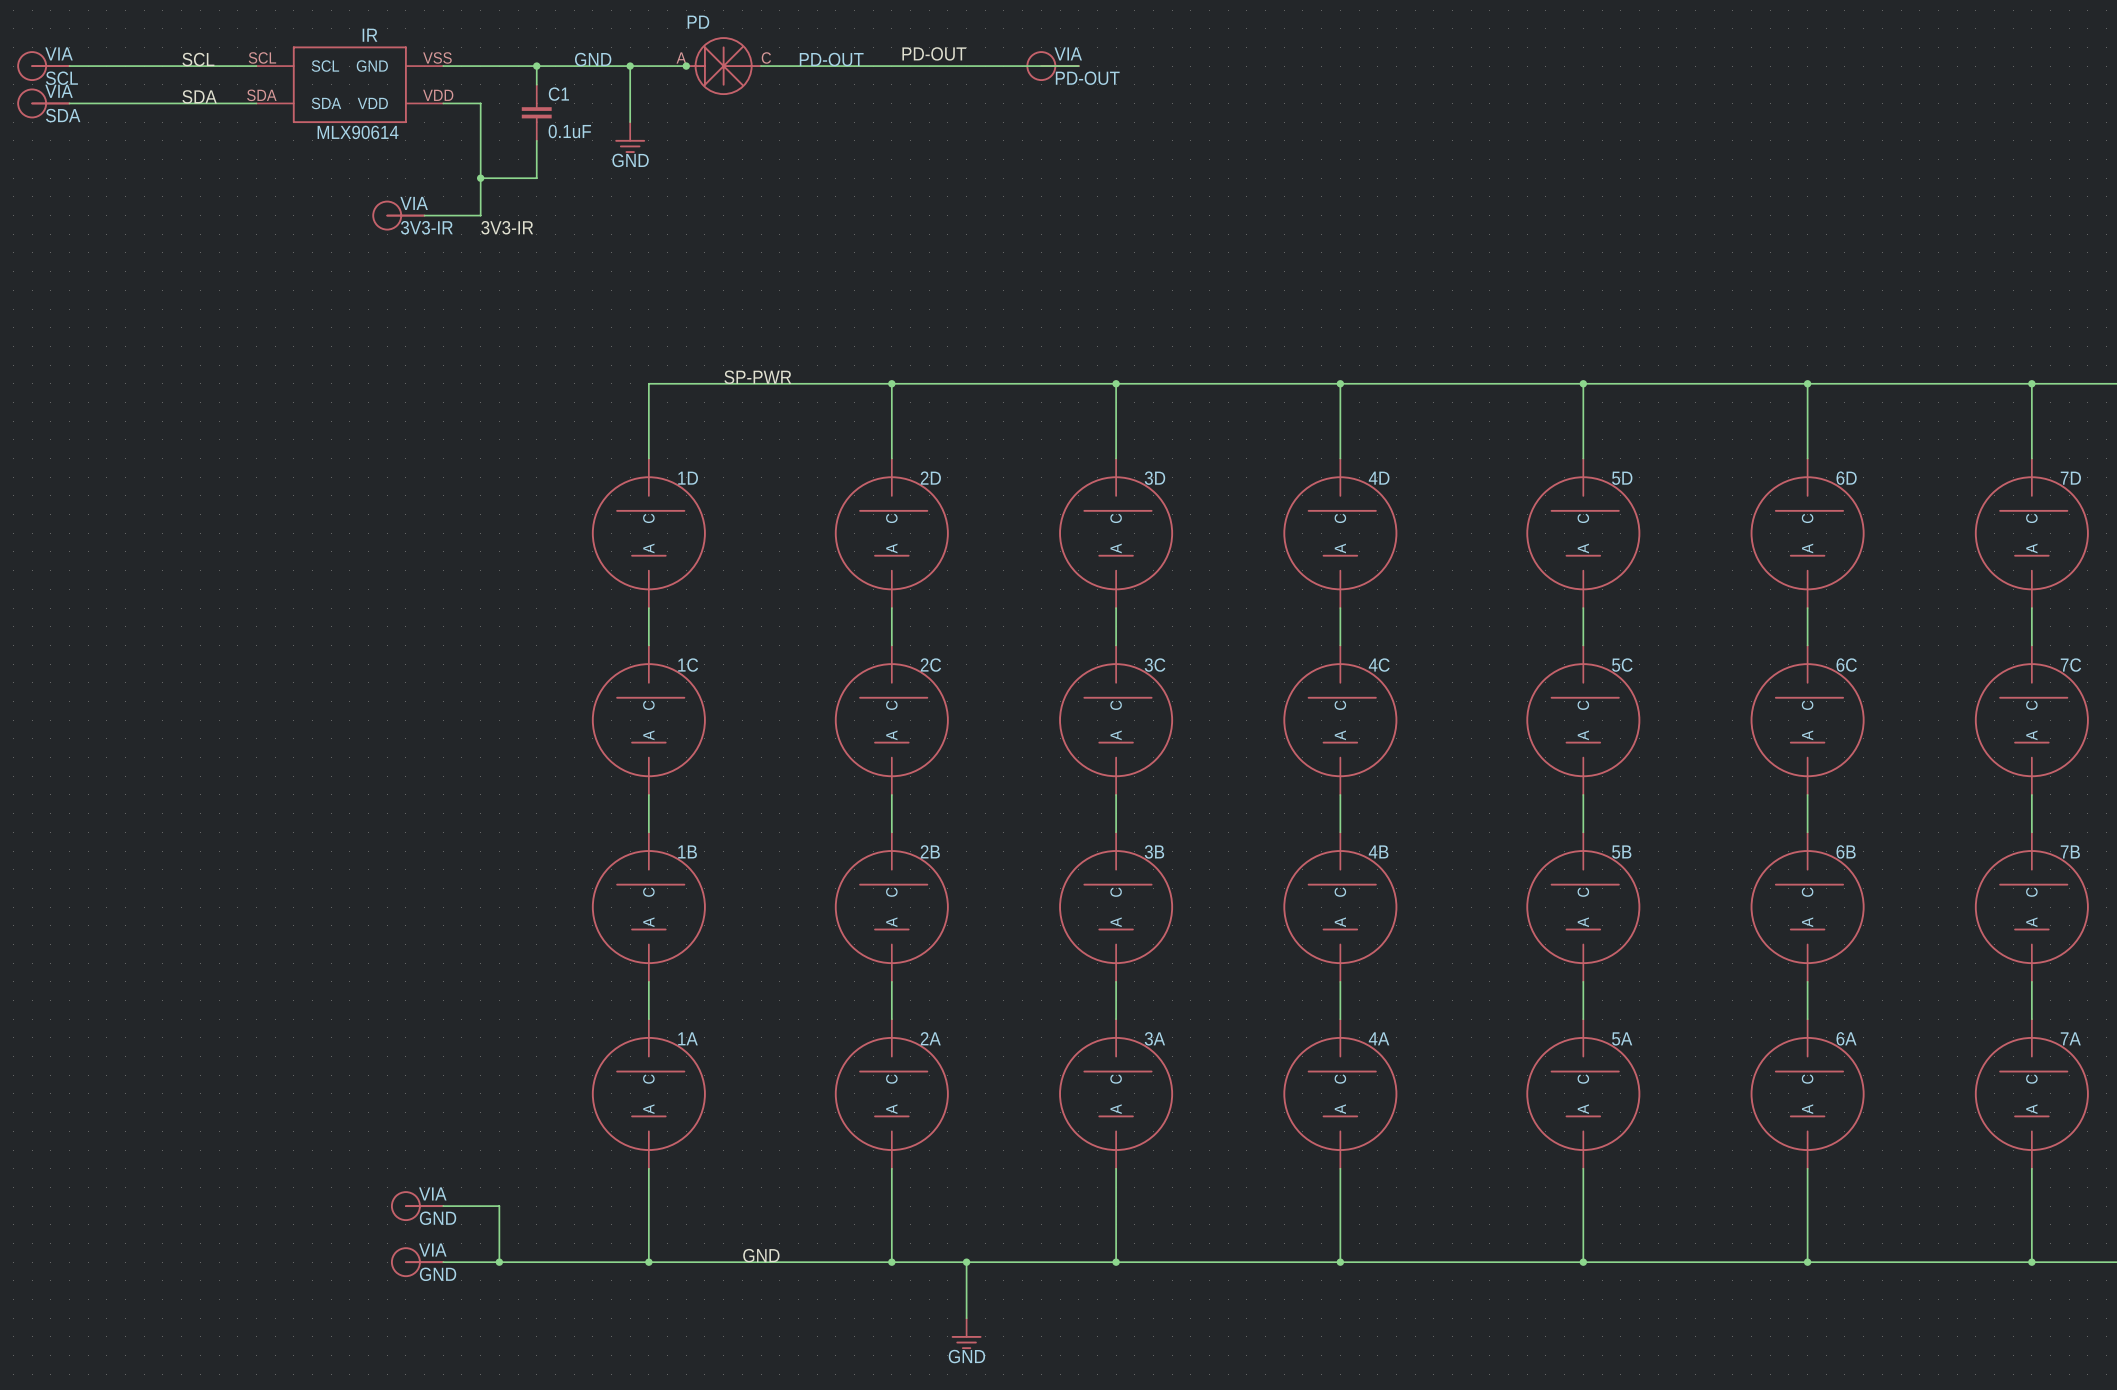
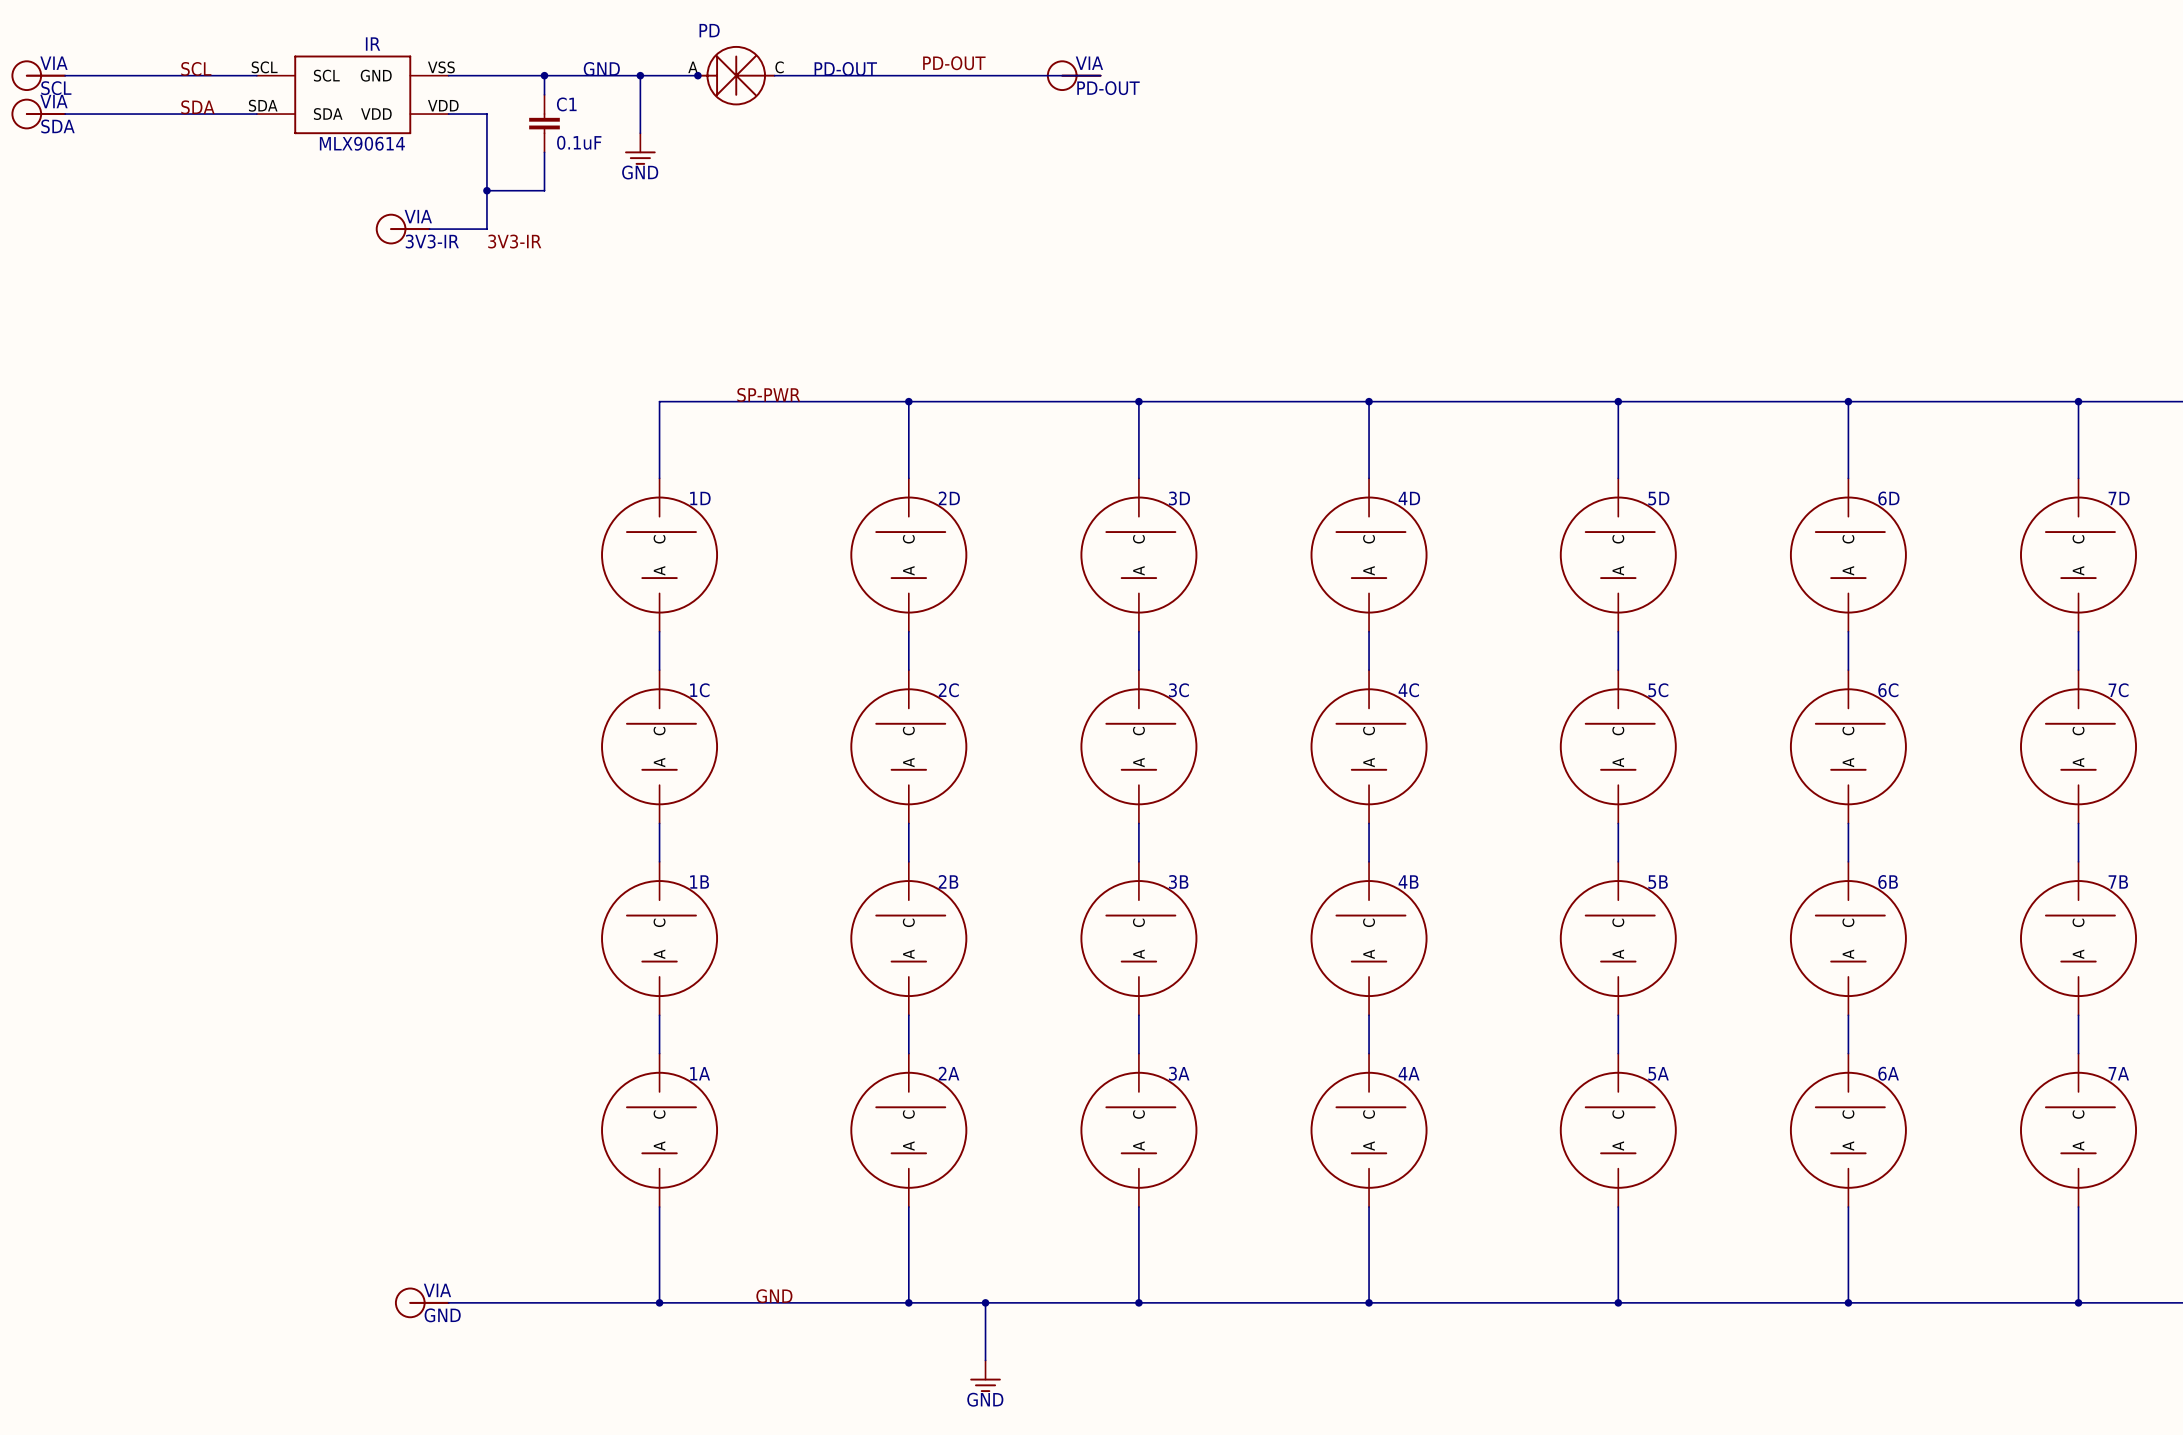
part: GND (417, 1206) -> none
wire: (443, 1206) (499, 1206) (499, 1262) -> none
junction: (499, 1262) -> none

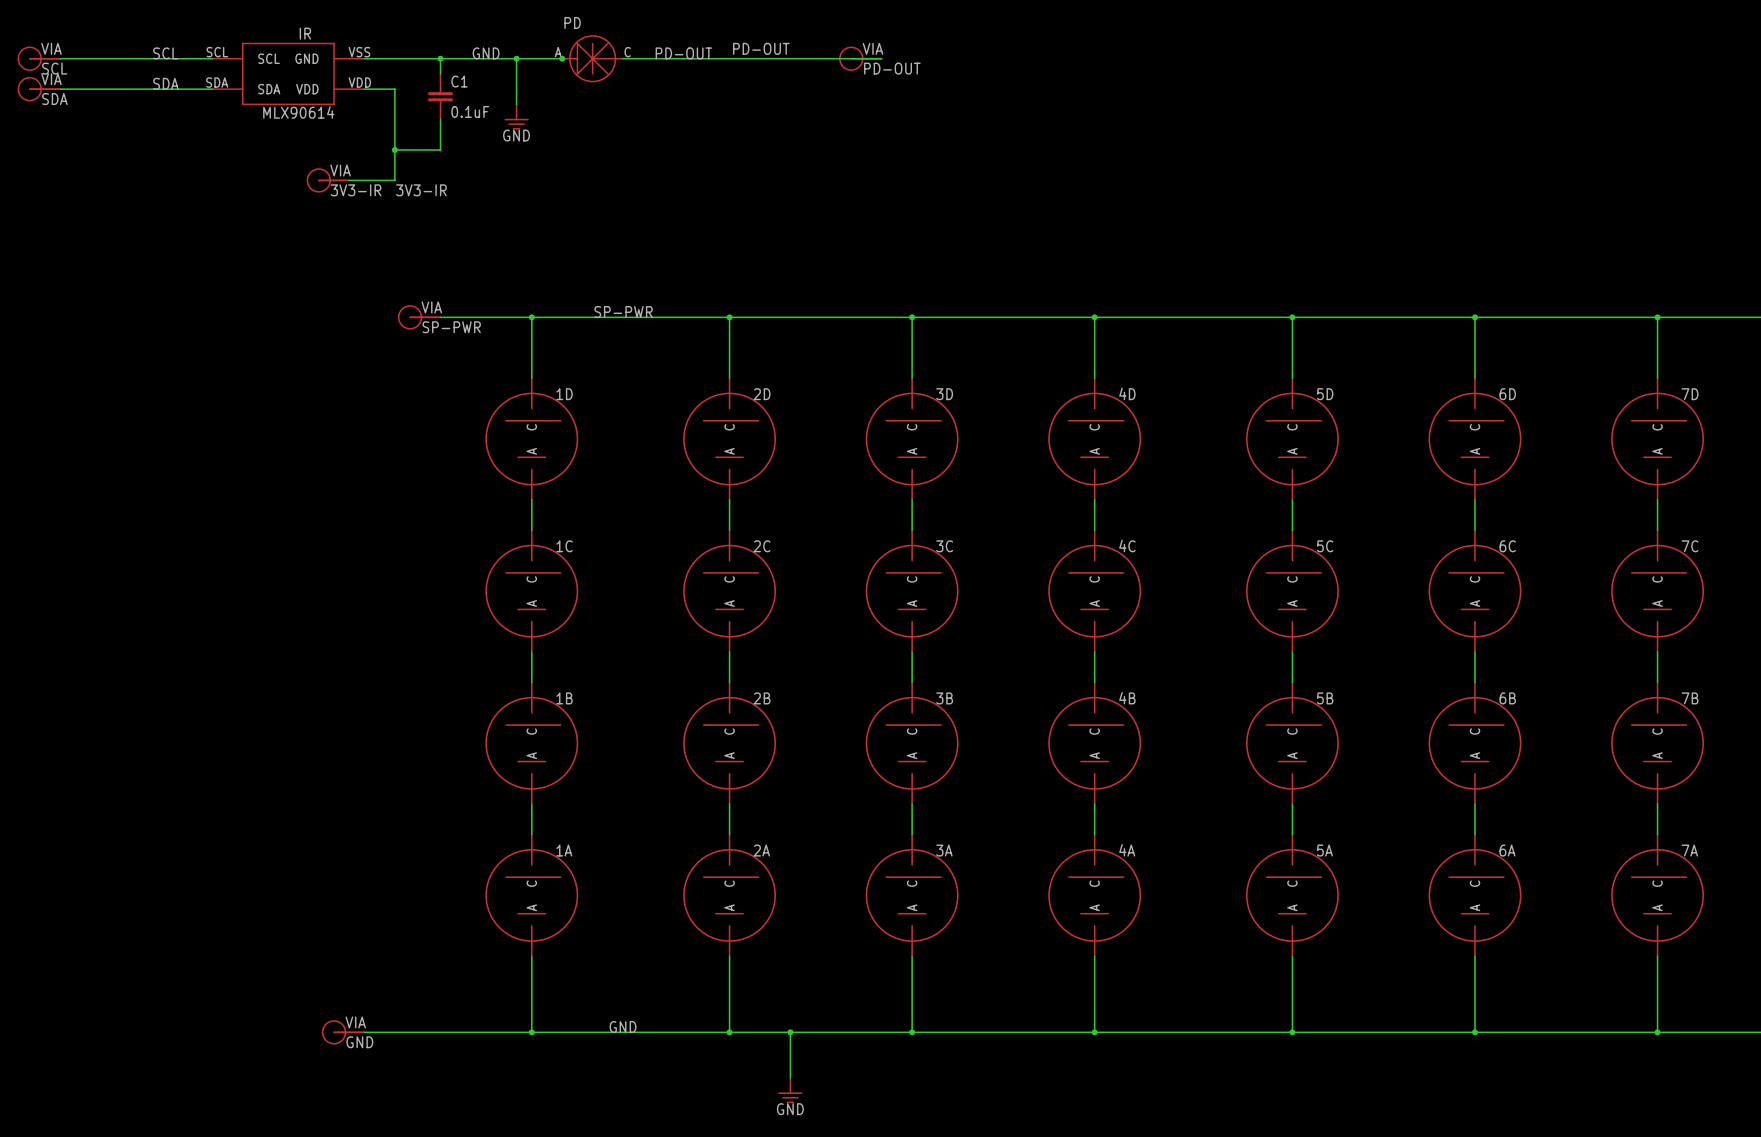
part: none -> SP-PWR (419, 317)
wire: none -> (440, 317) (531, 317)
junction: none -> (531, 317)

